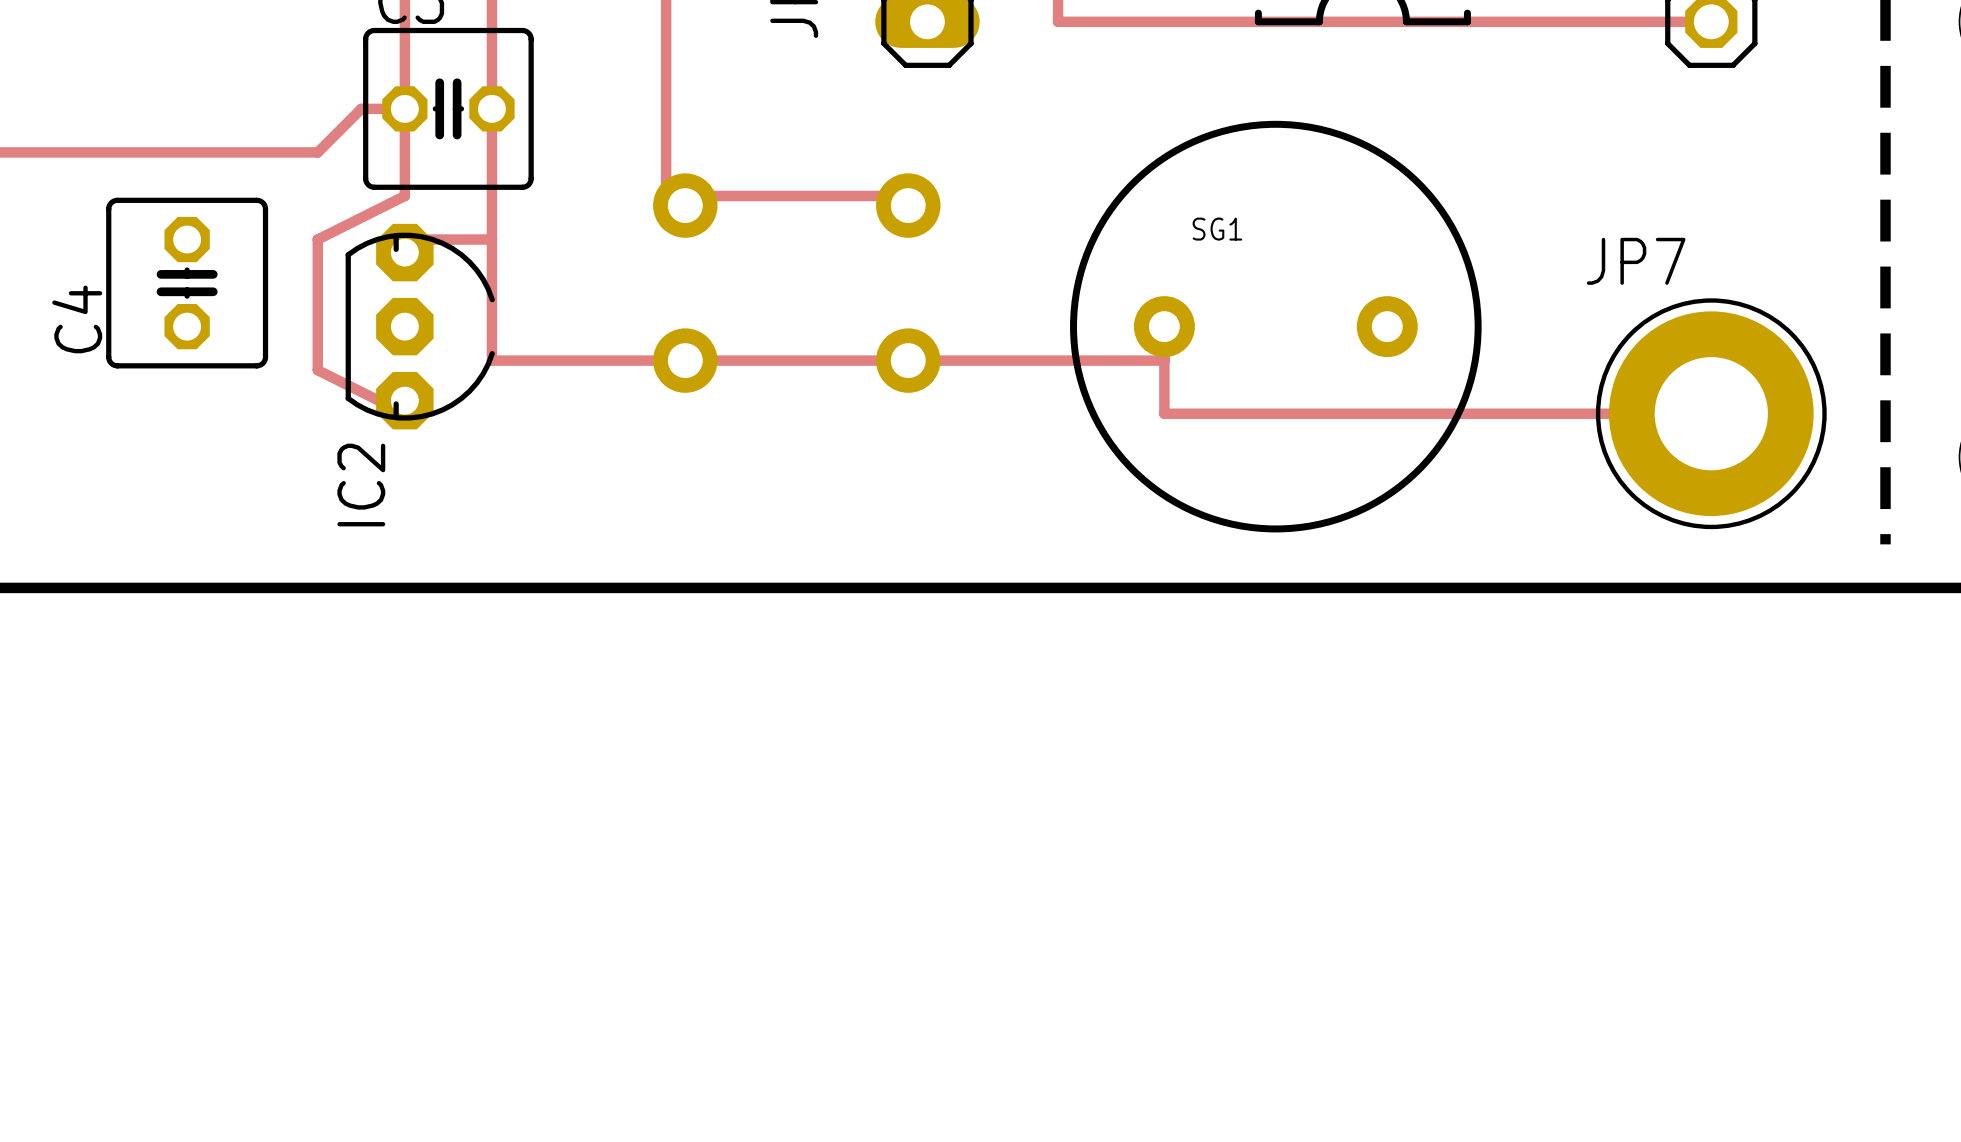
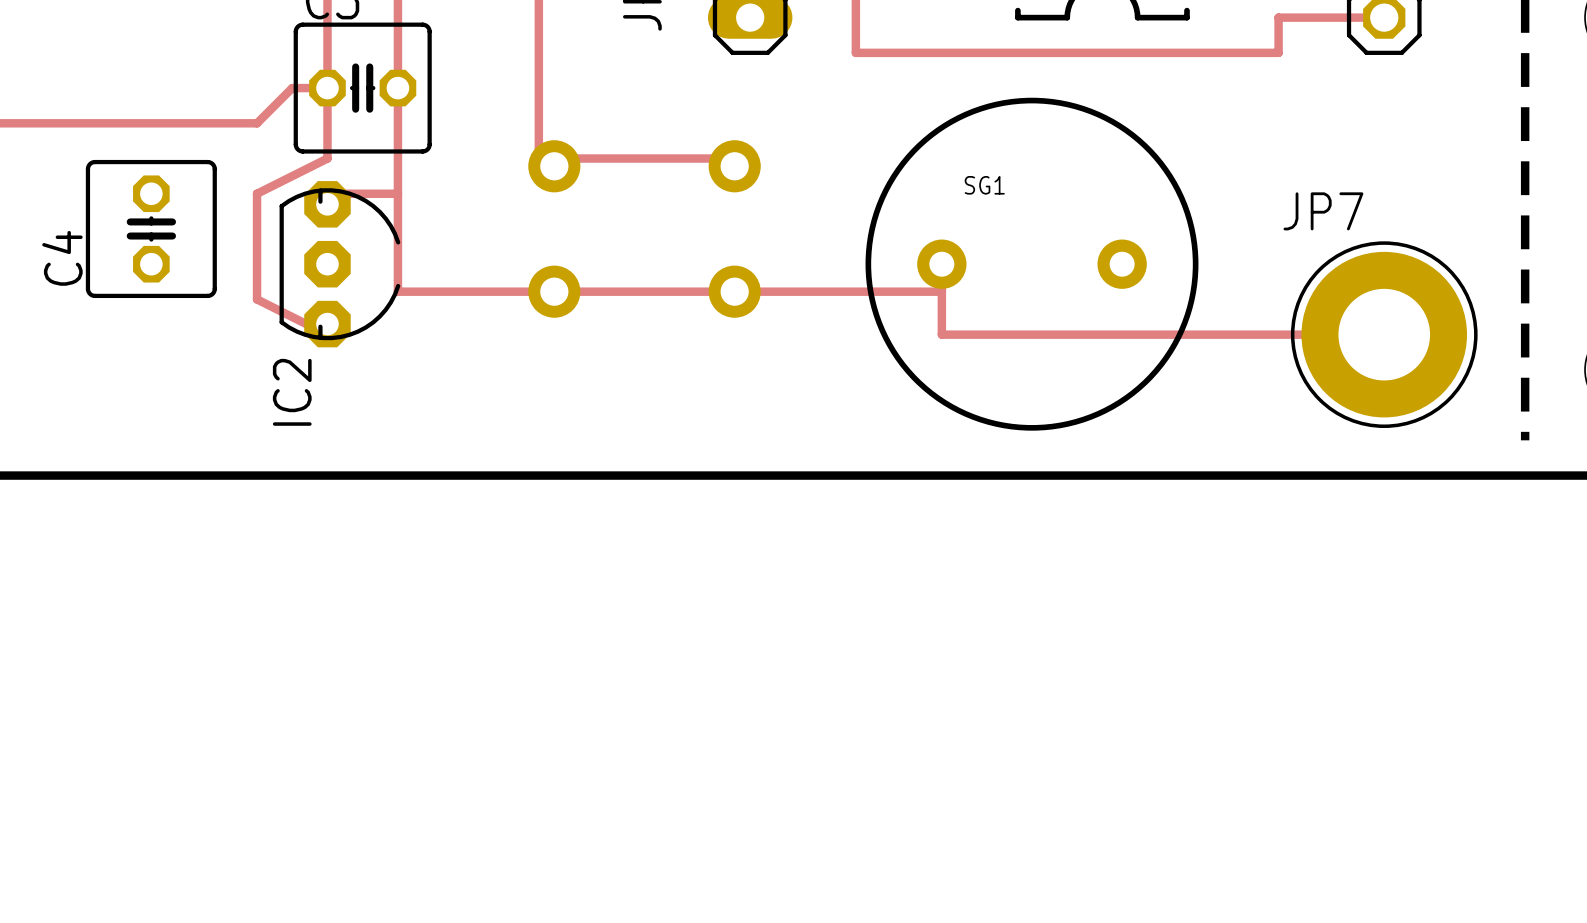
track: (1058, 21) (1580, 21) -> (855, 17) (855, 52) (1278, 52) (1278, 17)

